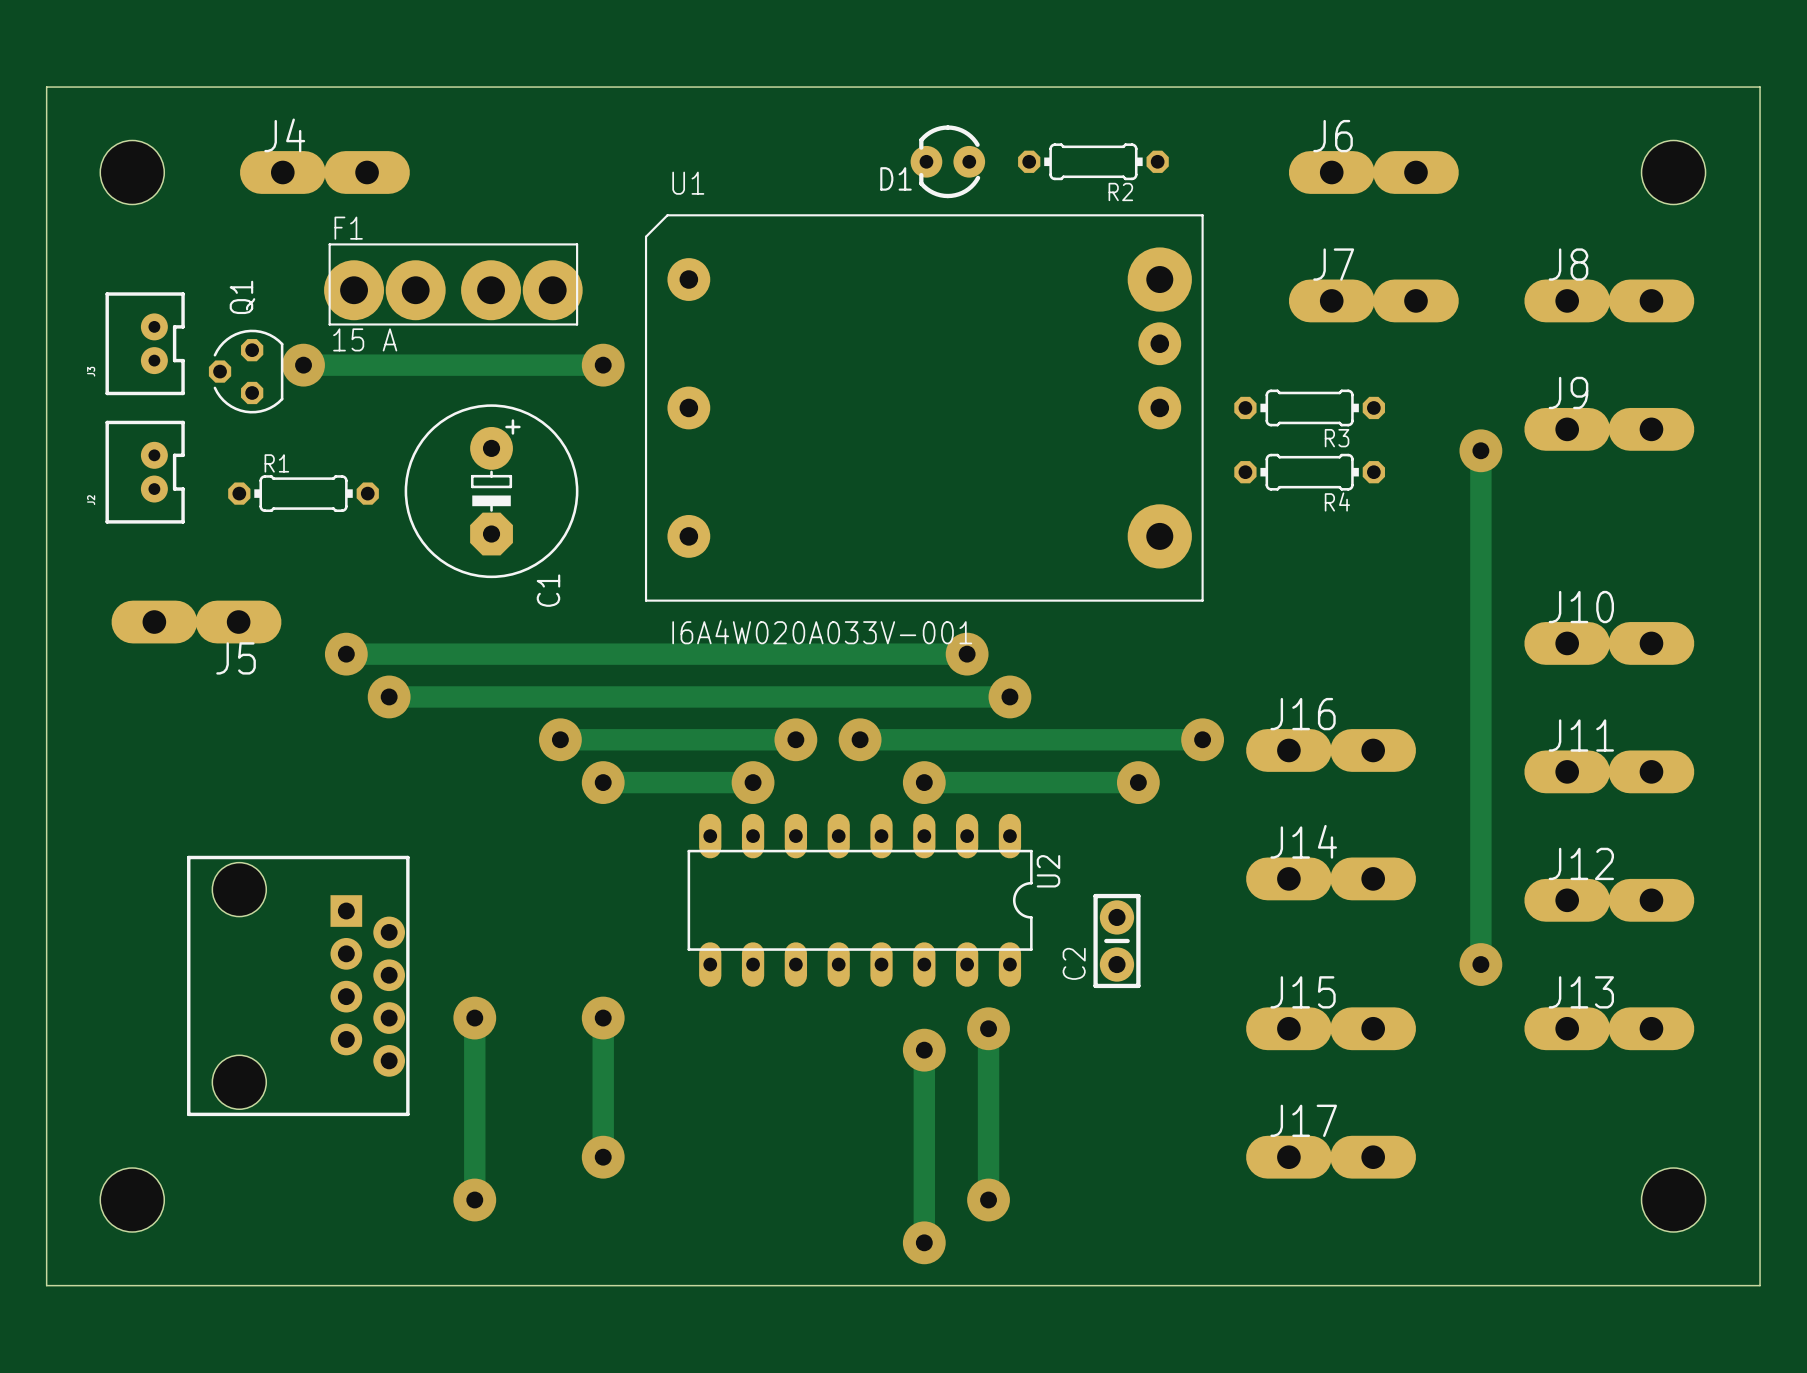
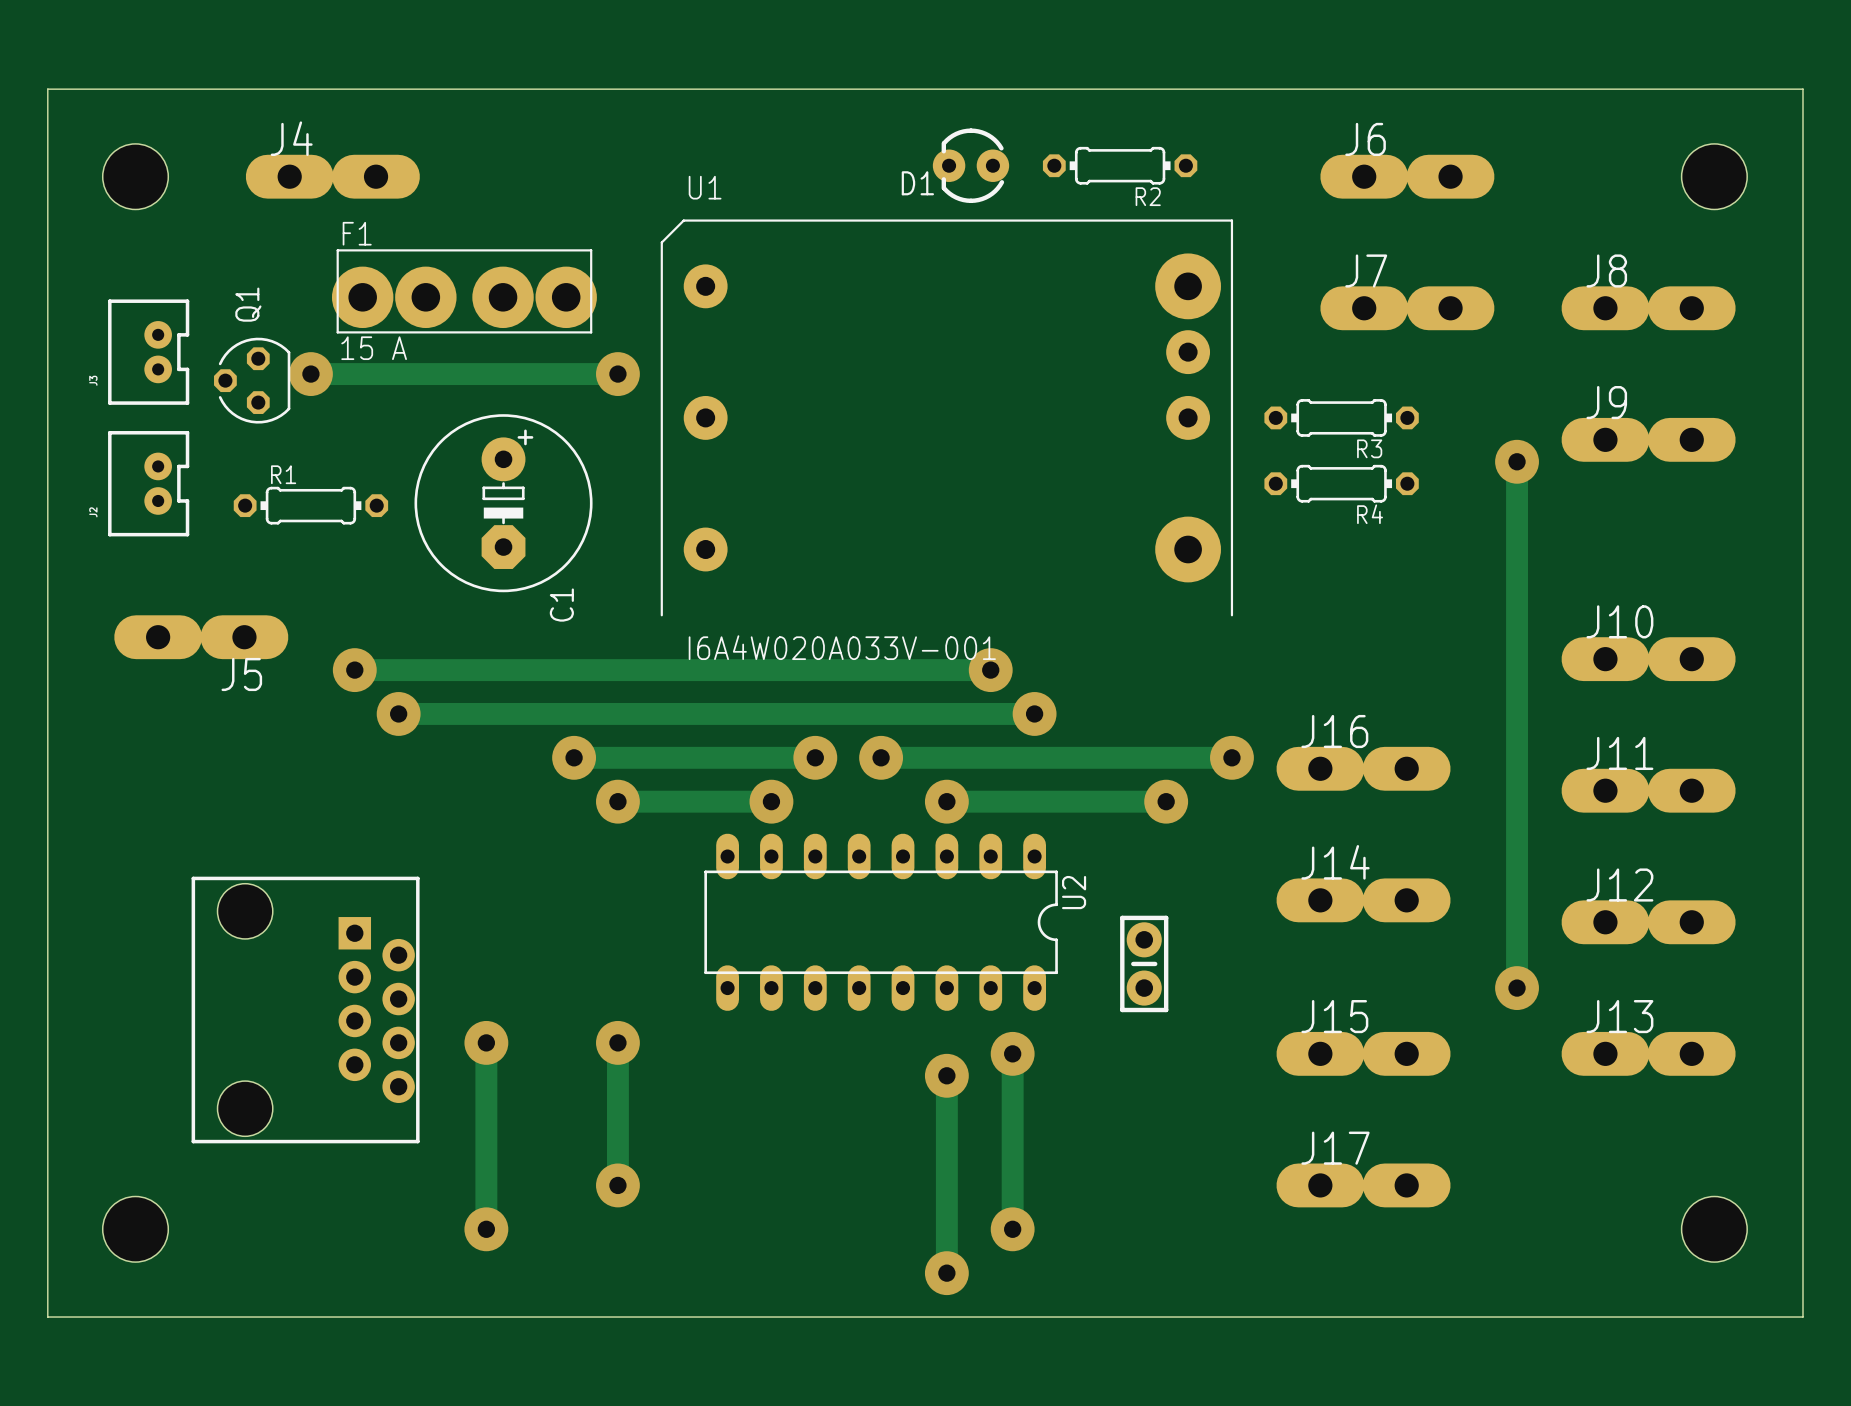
U1 footprint: [644, 214, 1204, 602] -> [660, 219, 1234, 617]
C2 name: C2 (1074, 963) -> none

